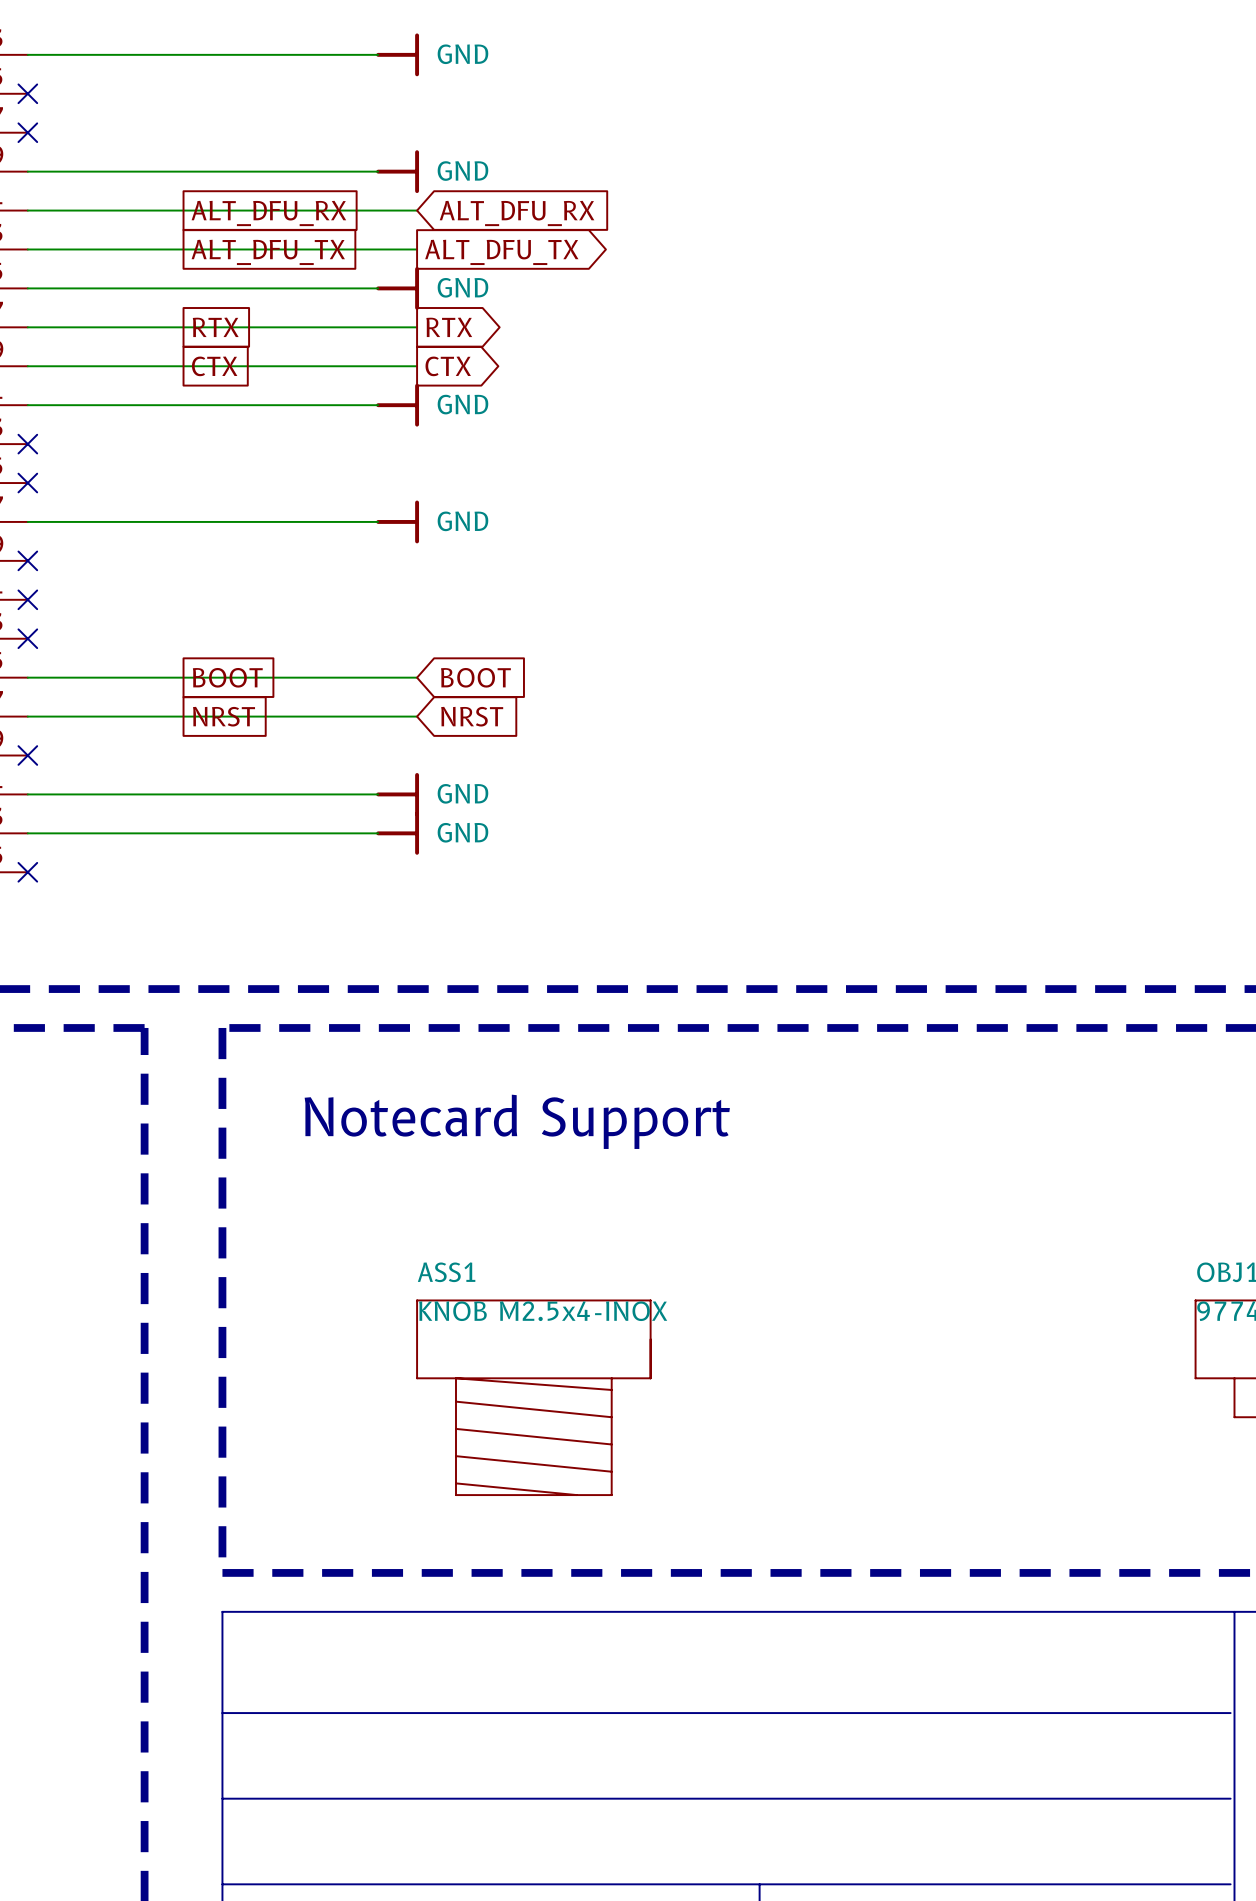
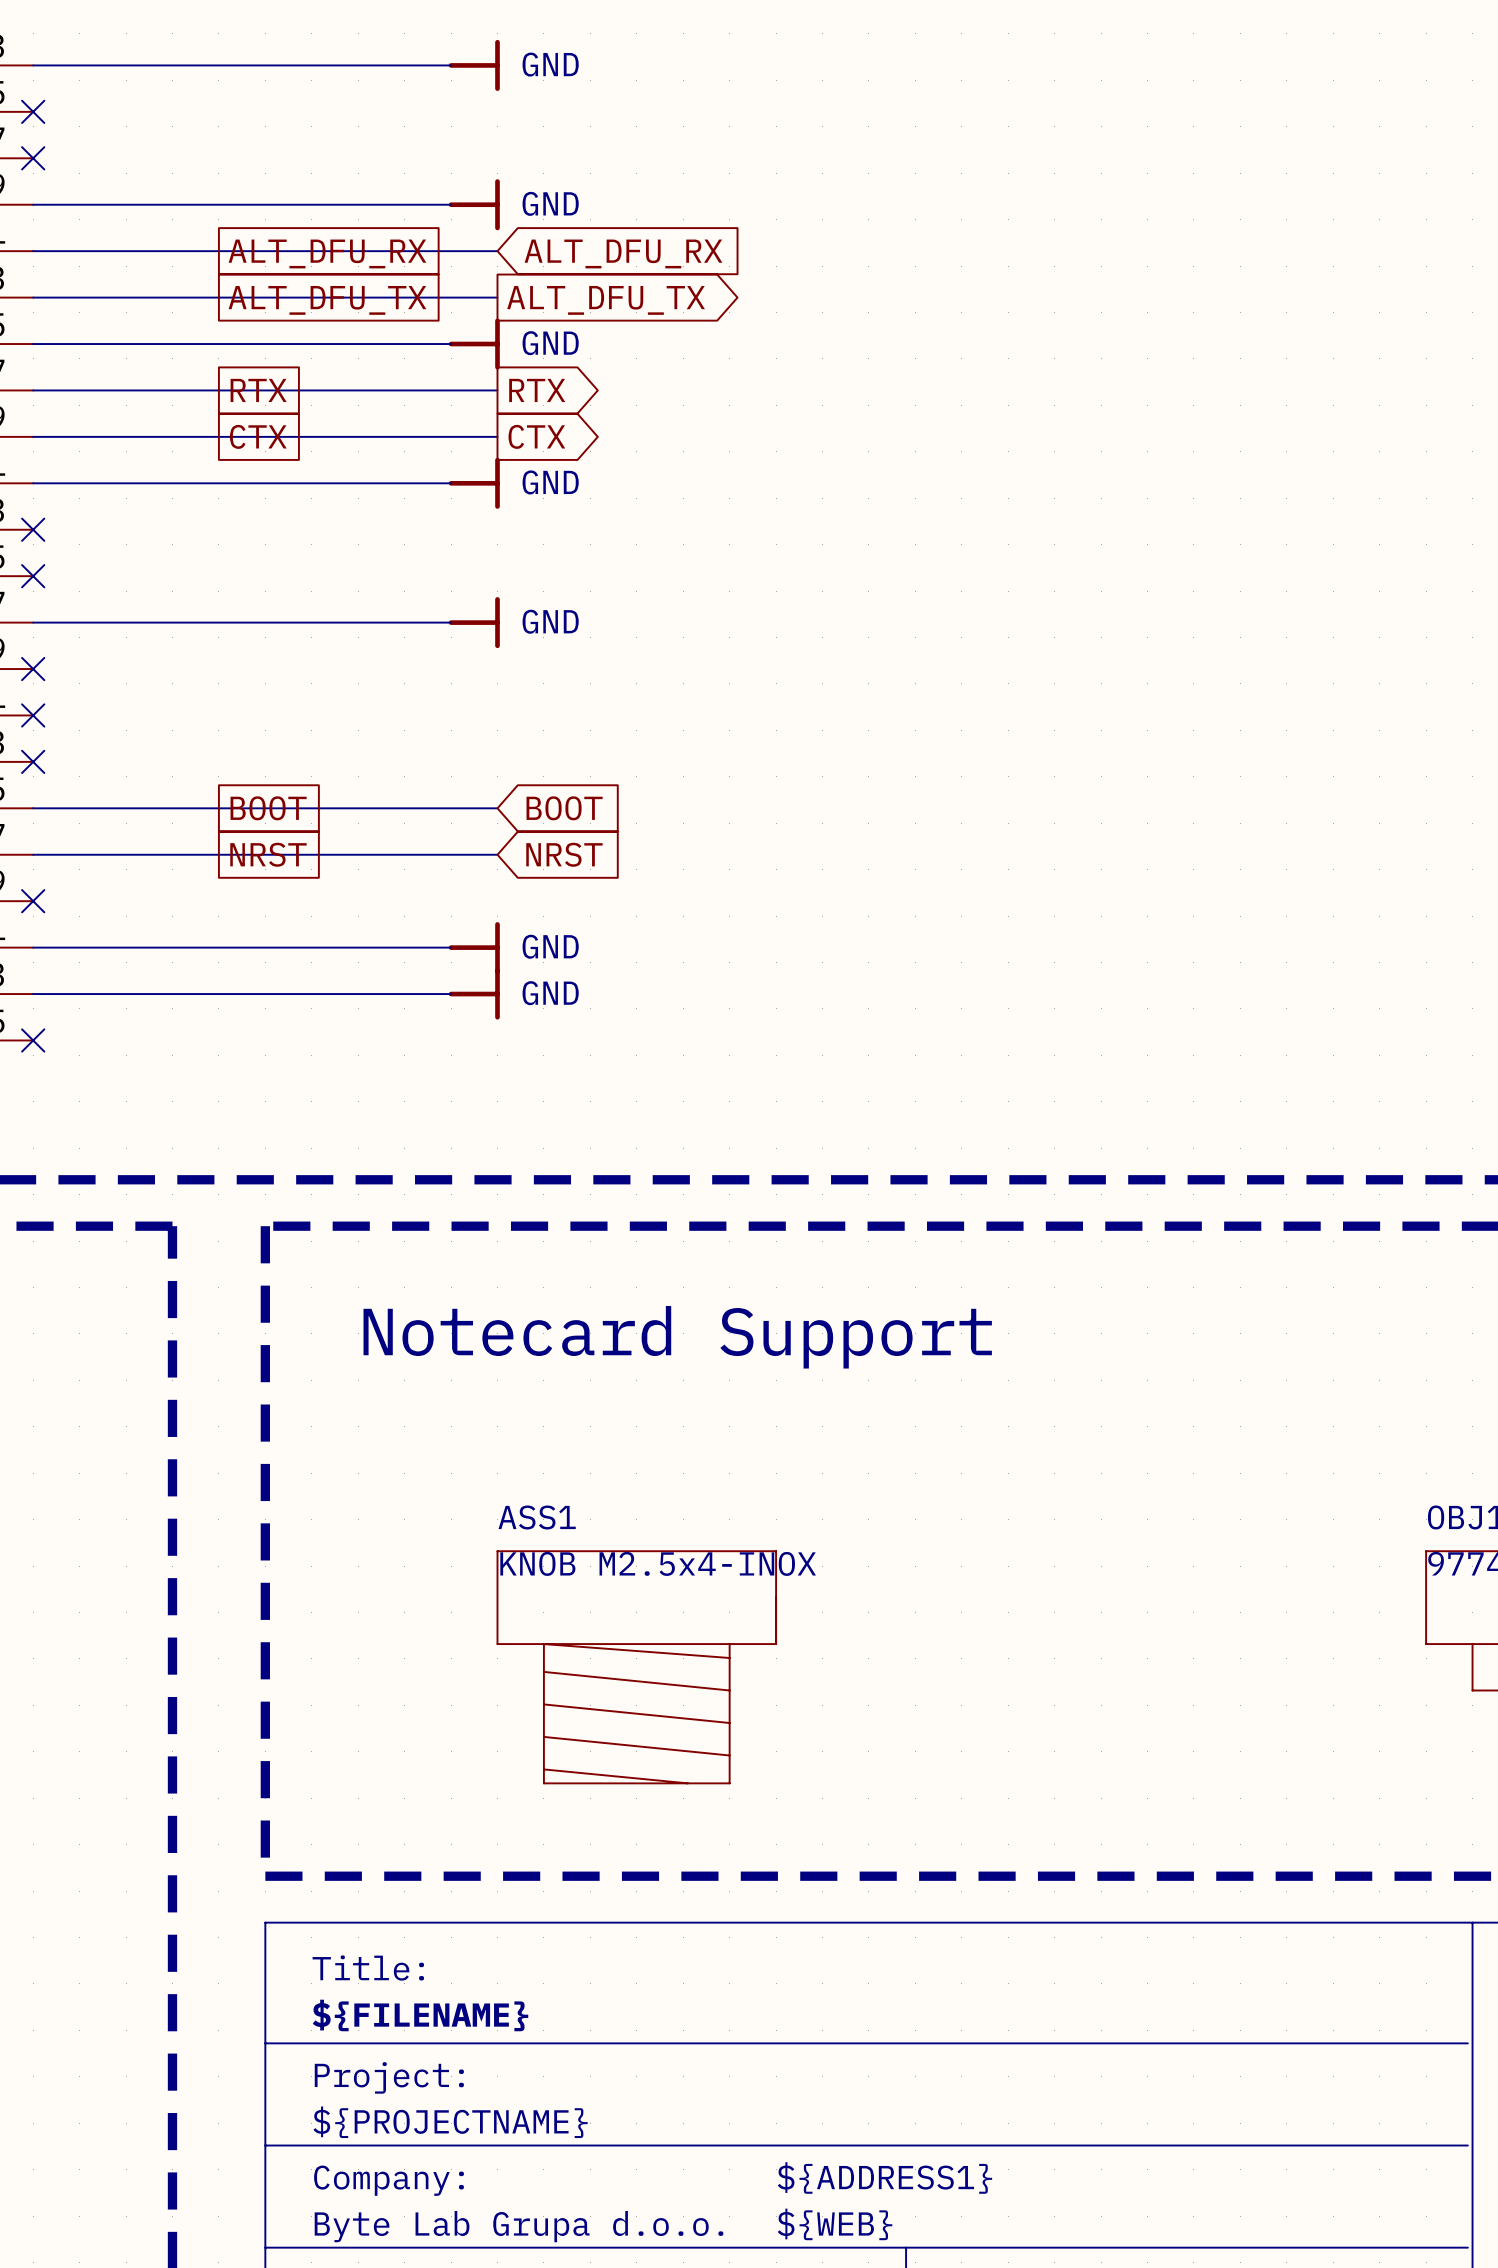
text: none -> Title: (368, 1968)
text: none -> ${FILENAME} (420, 2015)
text: none -> Project: (389, 2077)
text: none -> ${PROJECTNAME} (450, 2122)
text: none -> ${ADDRESS1} (884, 2177)
text: none -> Company: (389, 2180)
text: none -> ${WEB} (835, 2224)
text: none -> Byte Lab Grupa d.o.o. (519, 2226)

